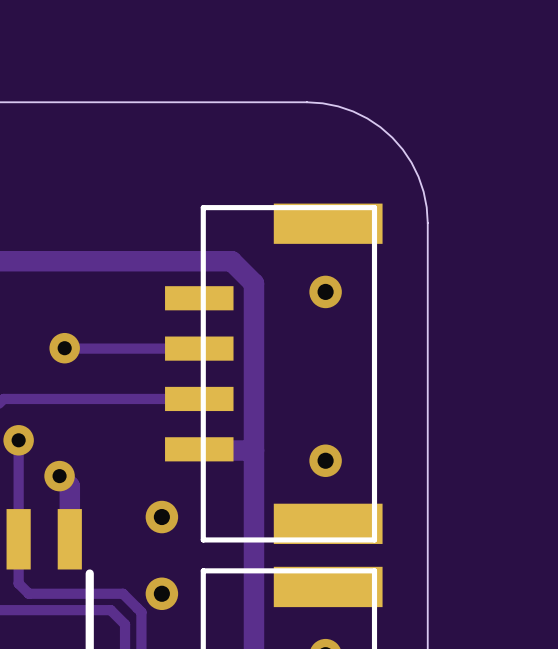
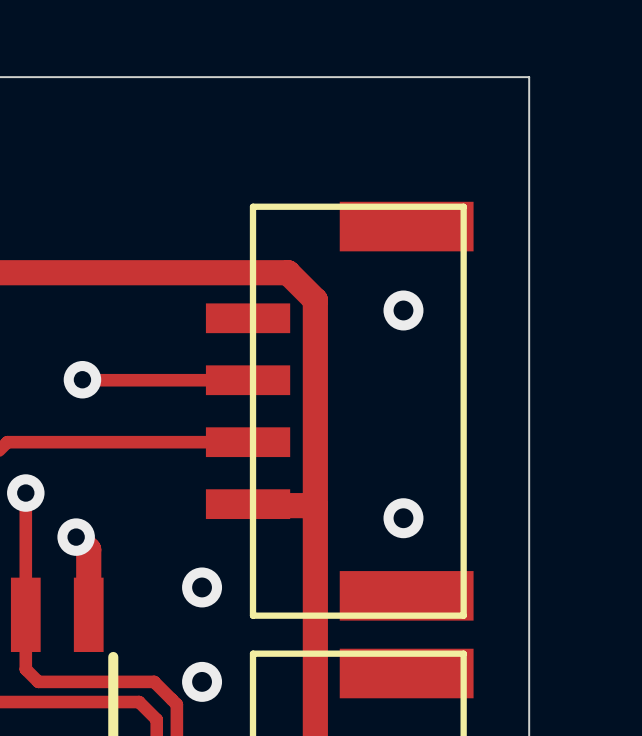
board edge: (306, 102) (338, 106) (353, 111) (367, 118) (392, 137) (411, 162) (418, 176) (423, 191) (427, 223) -> (380, 77) (529, 77) (529, 225)

